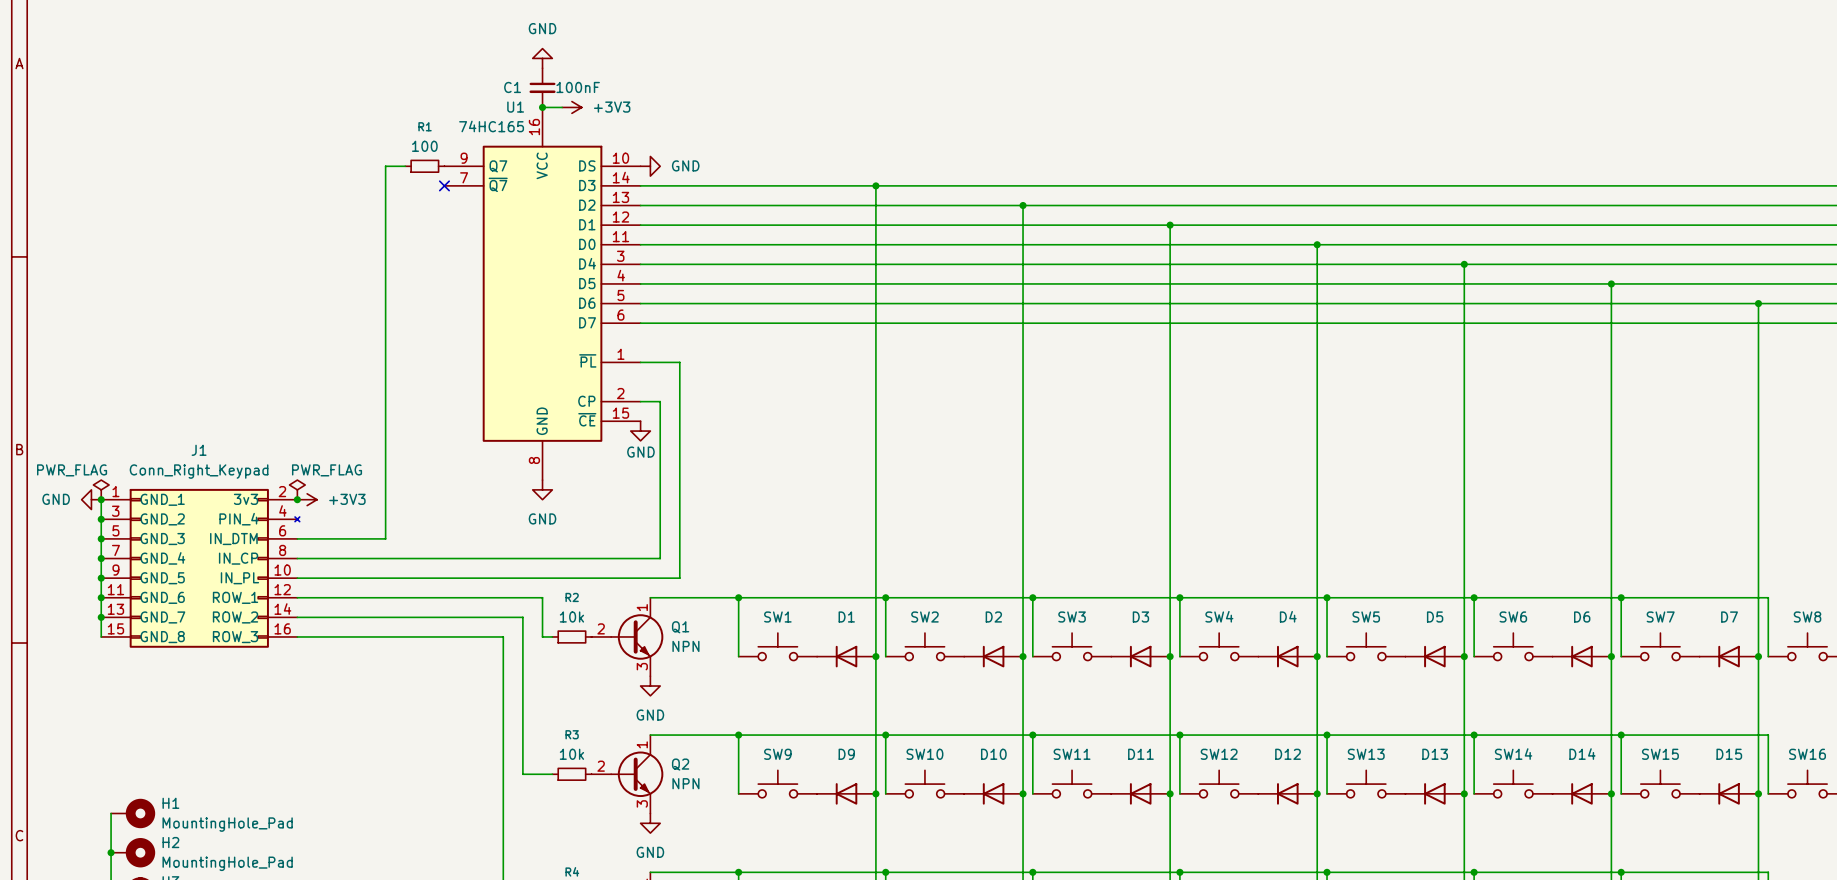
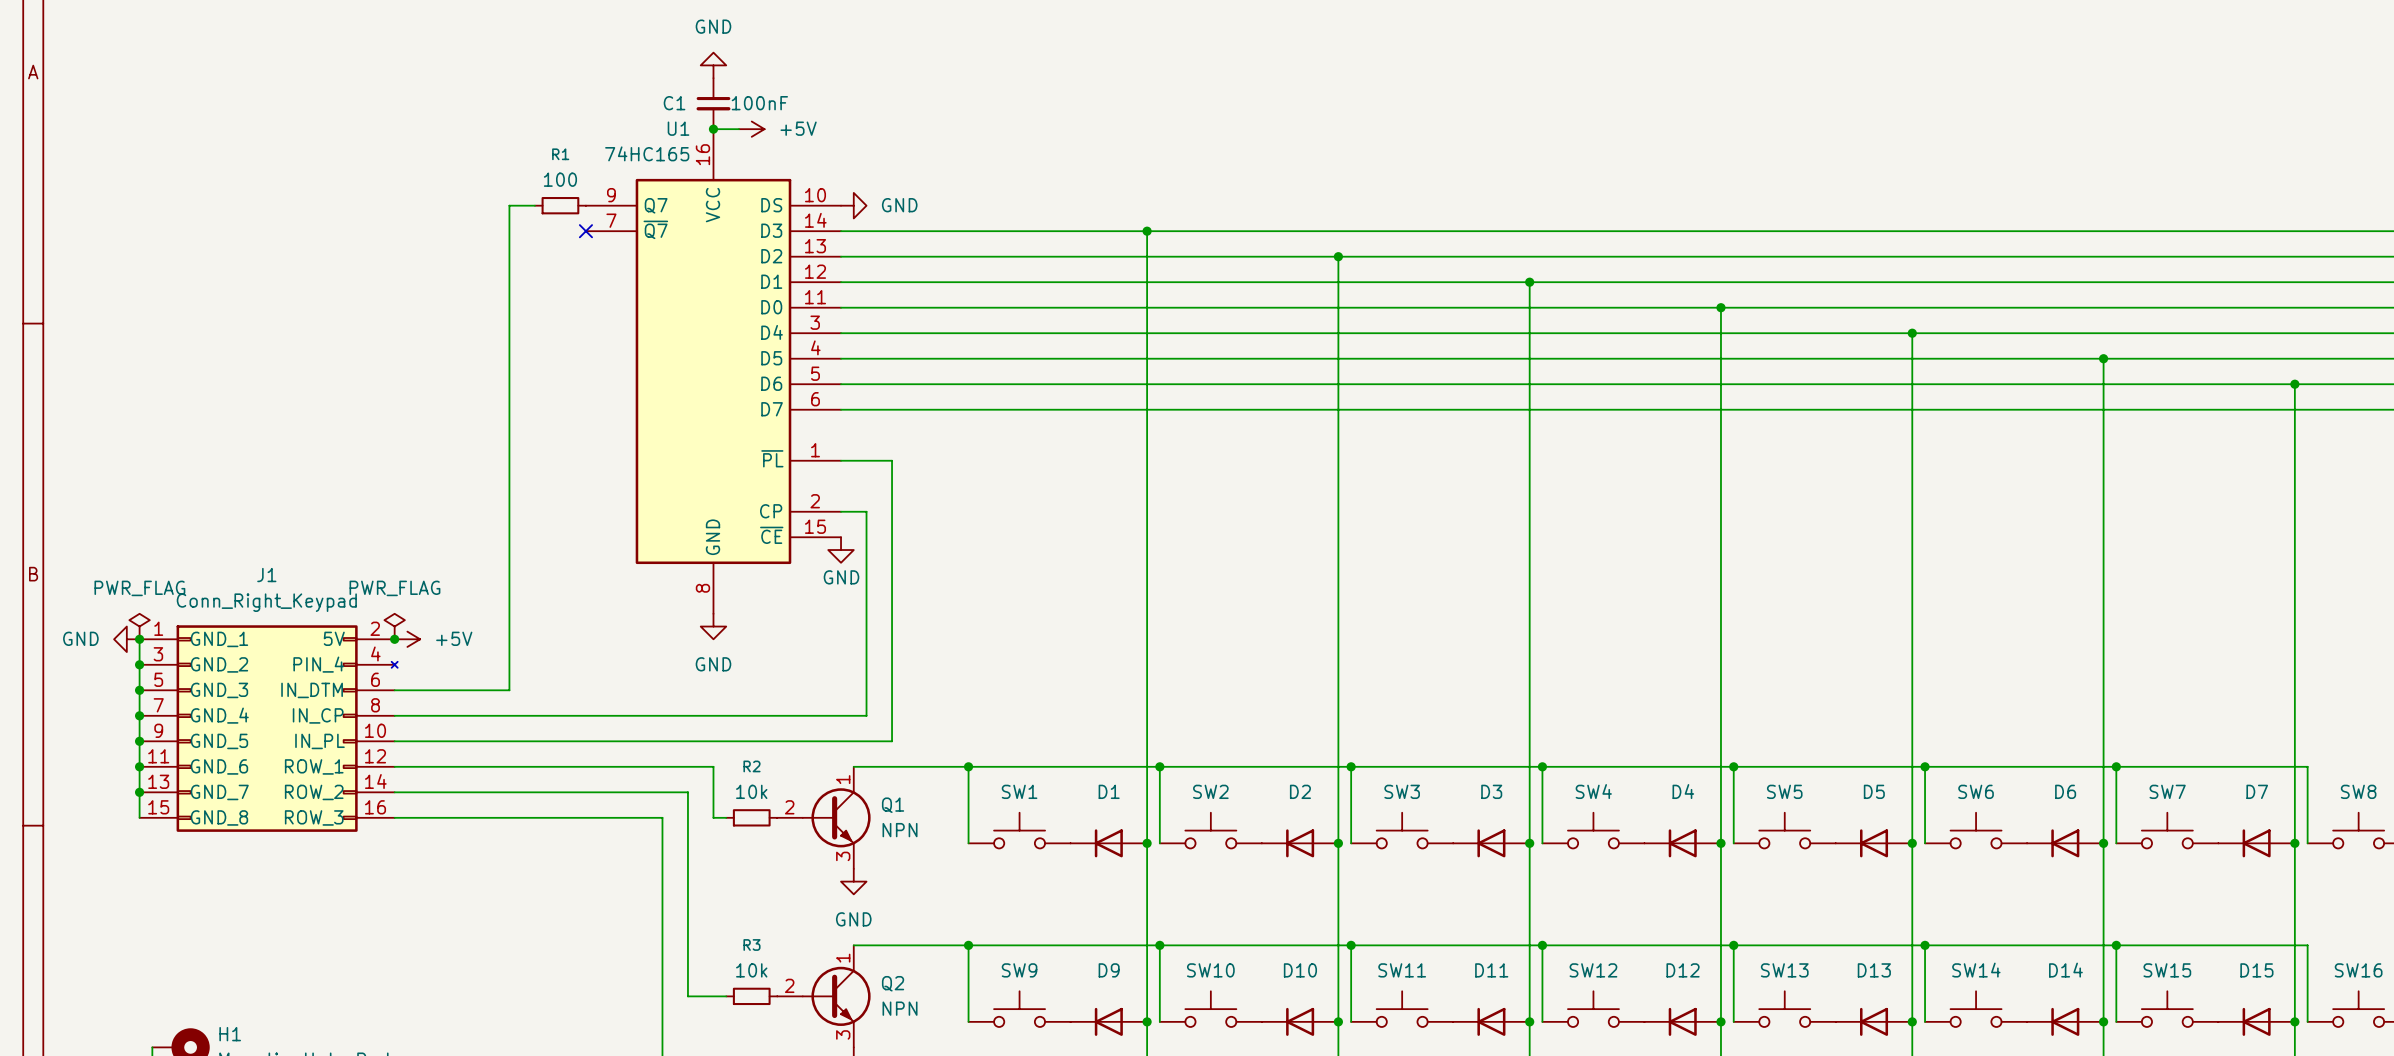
power symbol: +3V3 (571, 107) -> +5V (751, 129)
power symbol text position: PWR_FLAG (72, 470) -> PWR_FLAG (139, 588)
power symbol text position: PWR_FLAG (327, 470) -> PWR_FLAG (394, 588)
J1 pin name: 3v3 (246, 499) -> 5V (334, 638)
power symbol: +3V3 (307, 499) -> +5V (407, 639)

